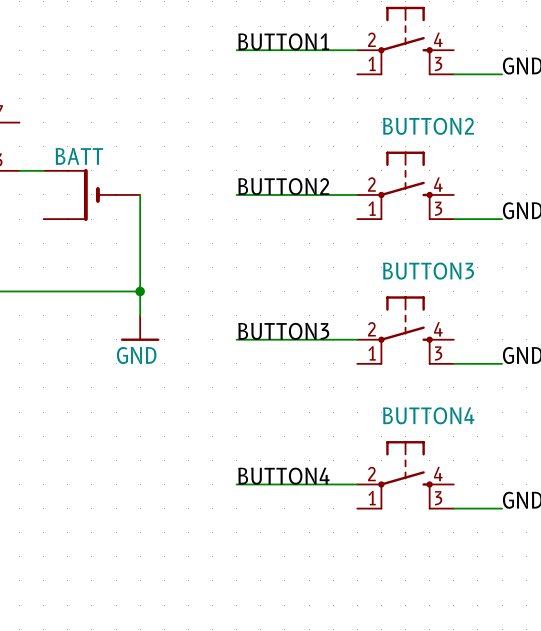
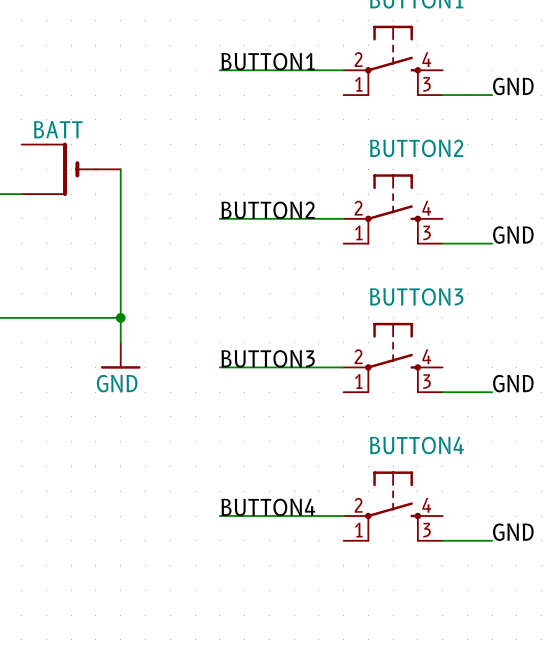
wire: none -> (120, 169) (120, 218)
BATT position: (91, 194) -> (71, 169)

